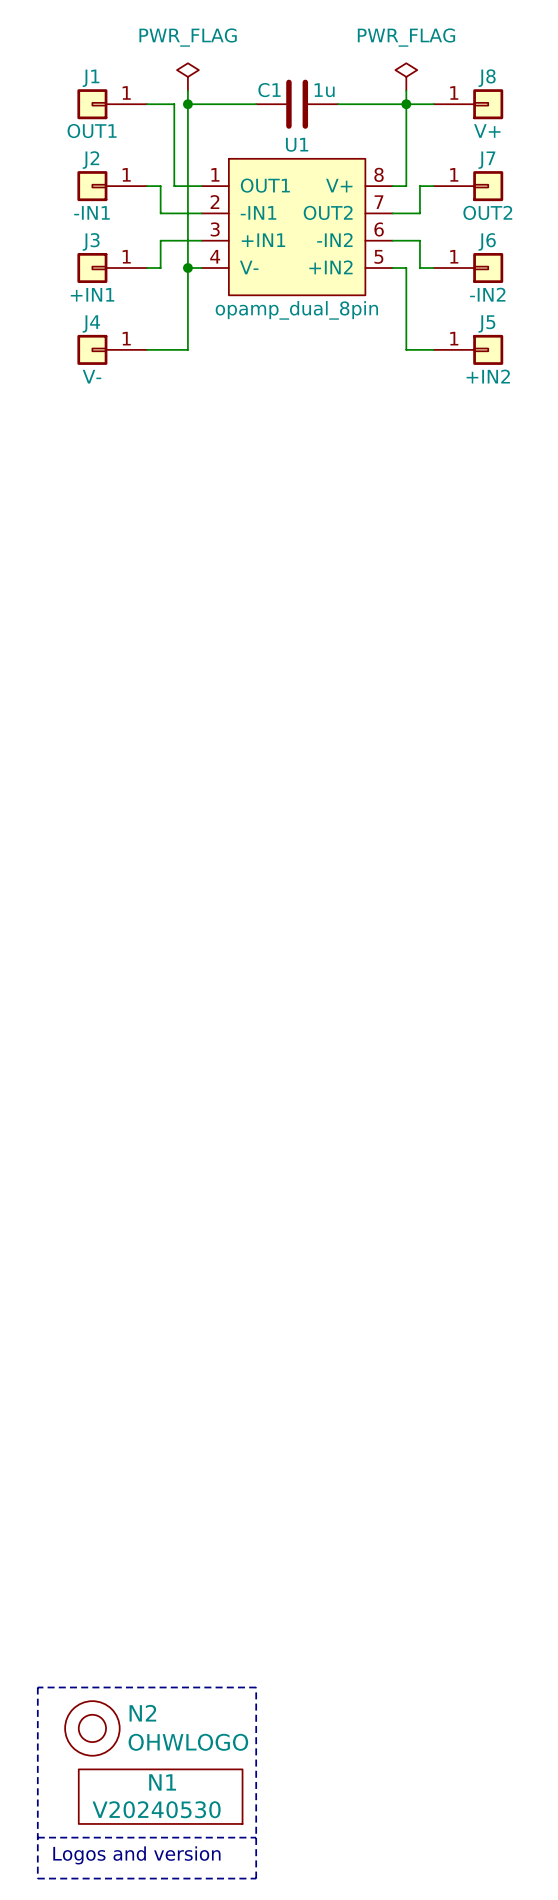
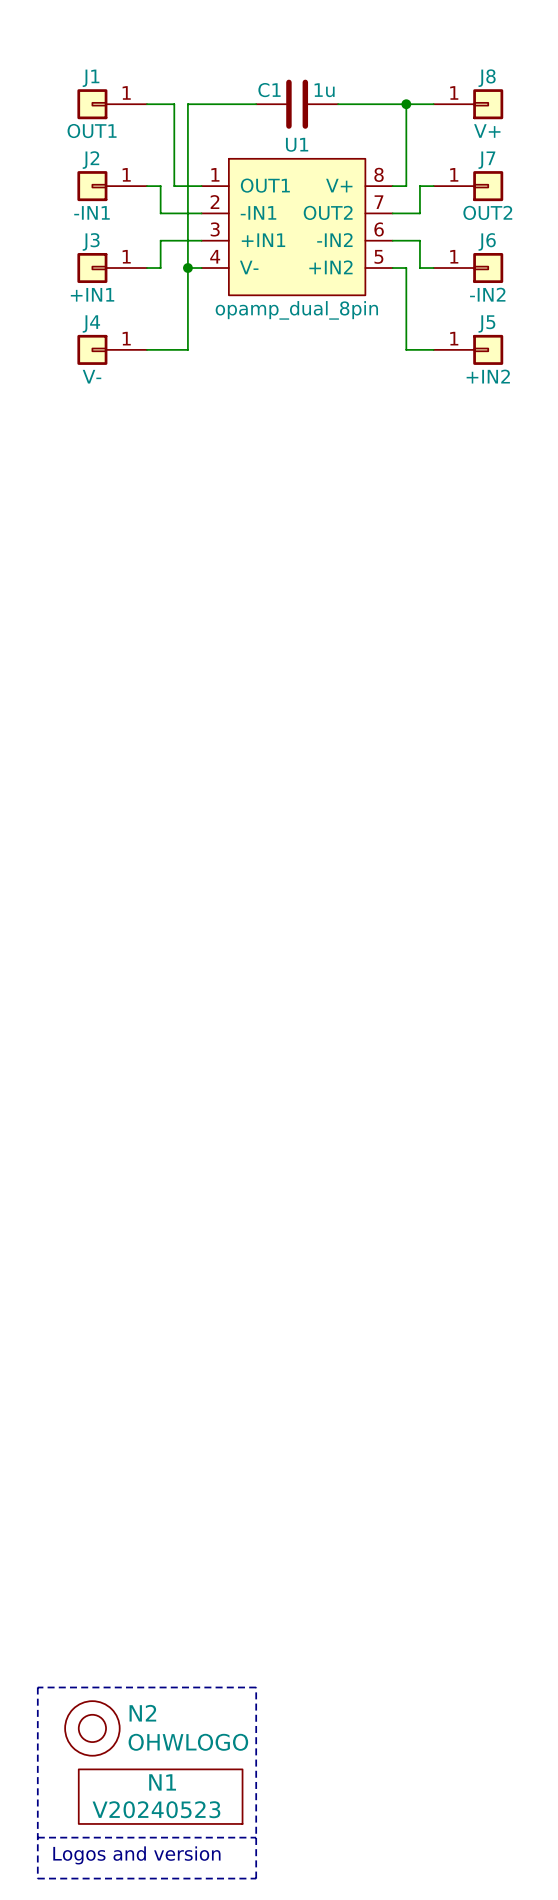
power symbol: PWR_FLAG (187, 76) -> none
power symbol: PWR_FLAG (406, 76) -> none
wire: (187, 90) (187, 104) -> none
wire: (406, 90) (406, 104) -> none
junction: (187, 104) -> none
N1 value: V20240530 (156, 1809) -> V20240523 (156, 1809)

